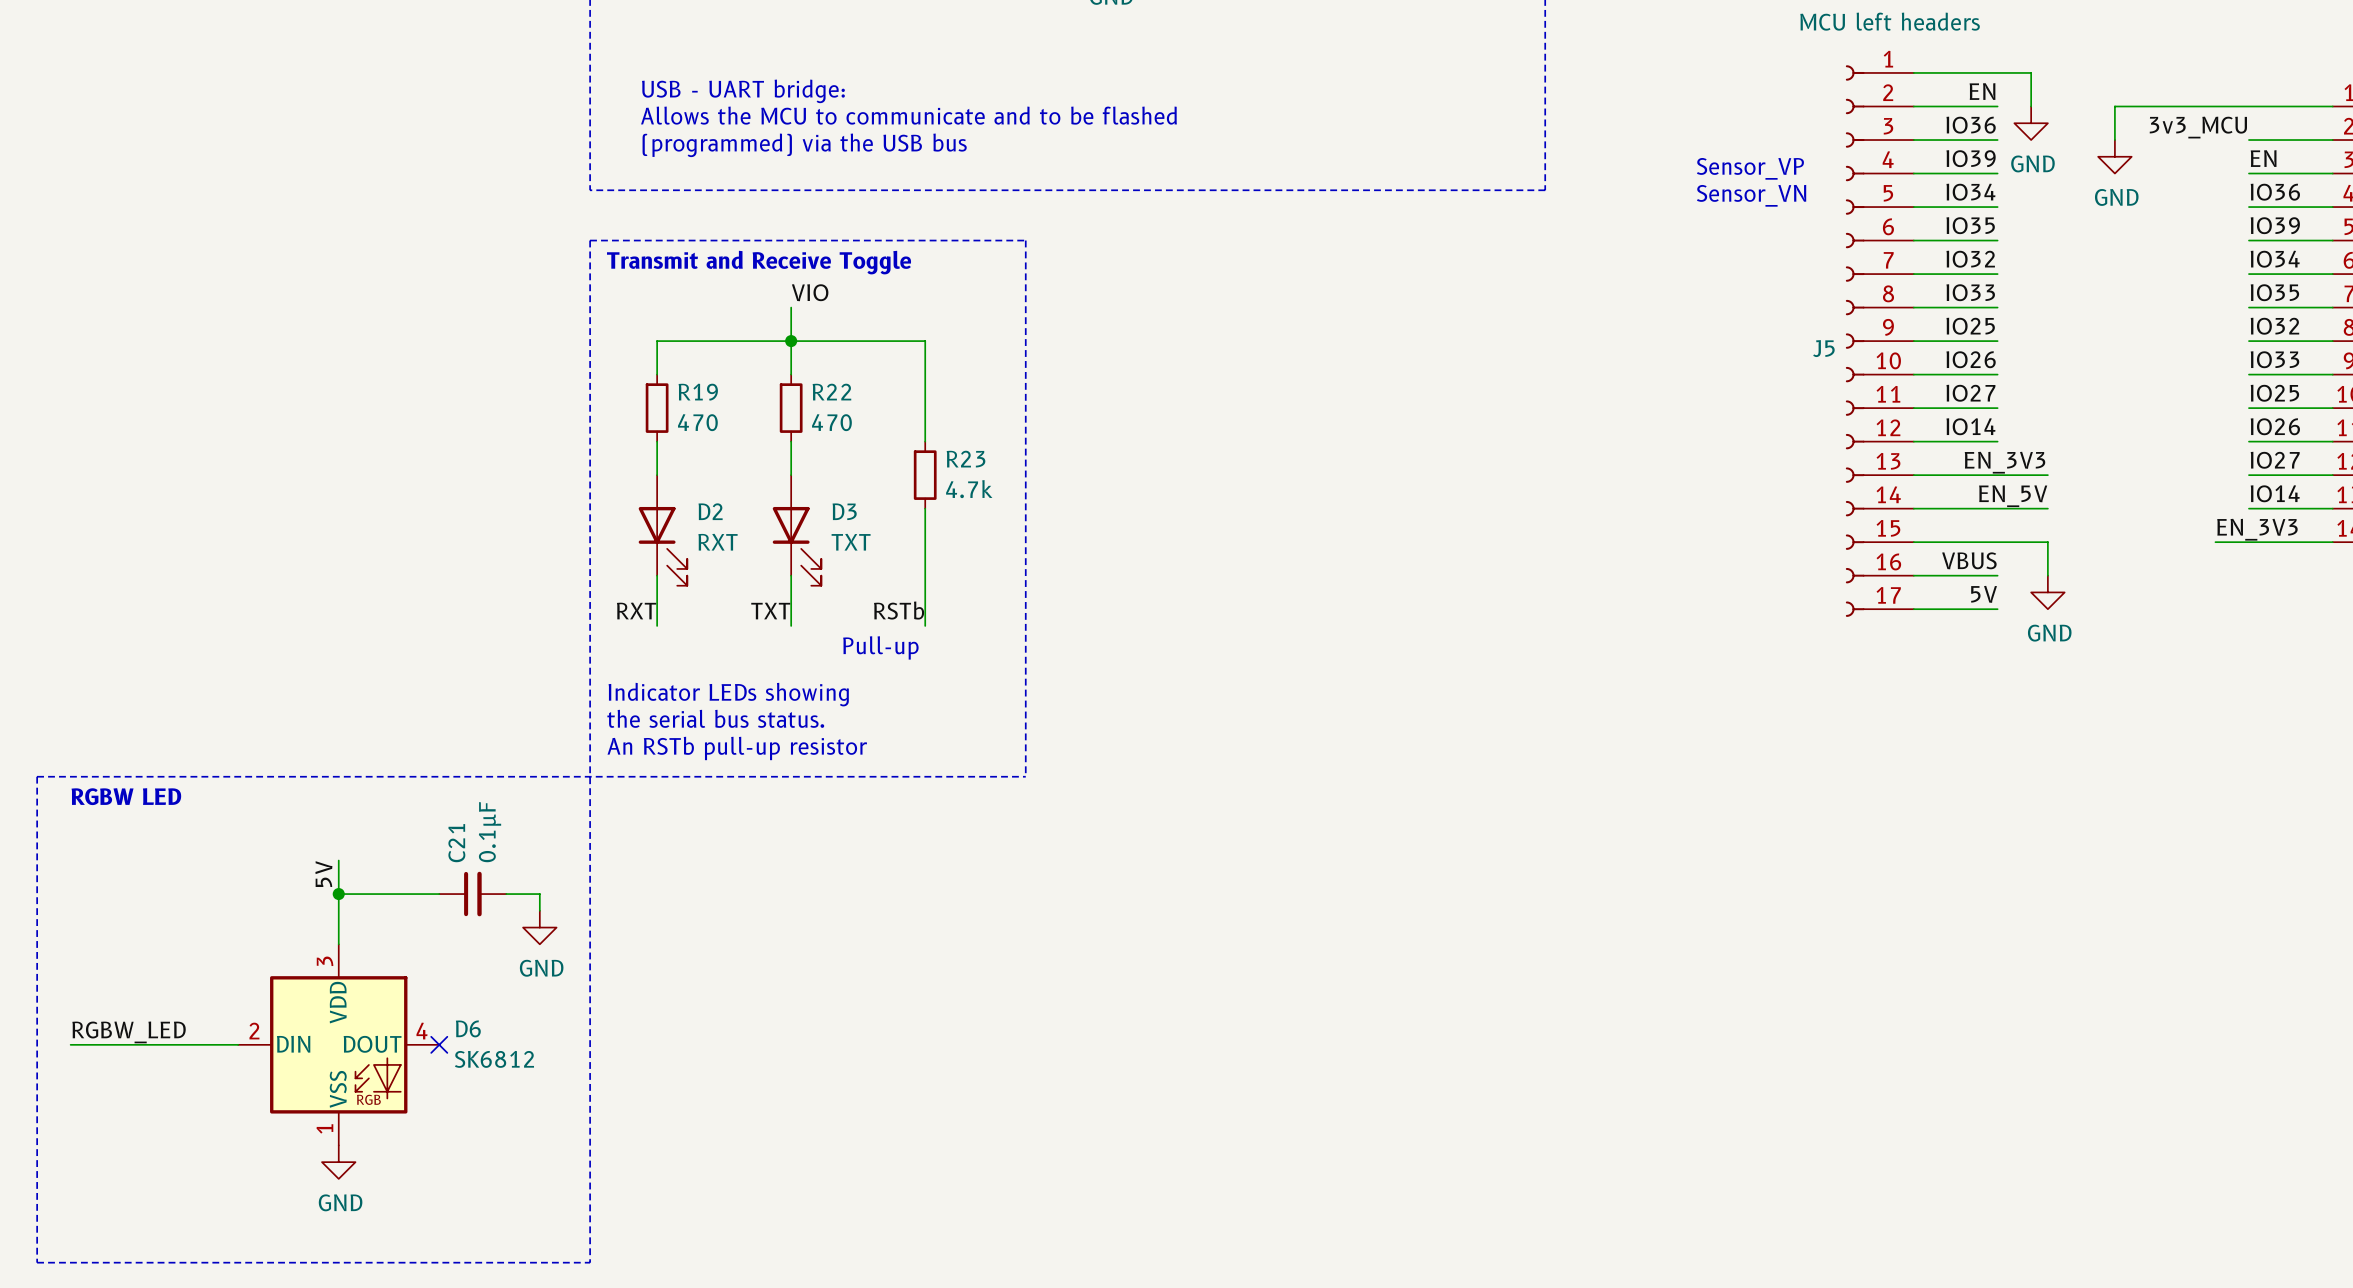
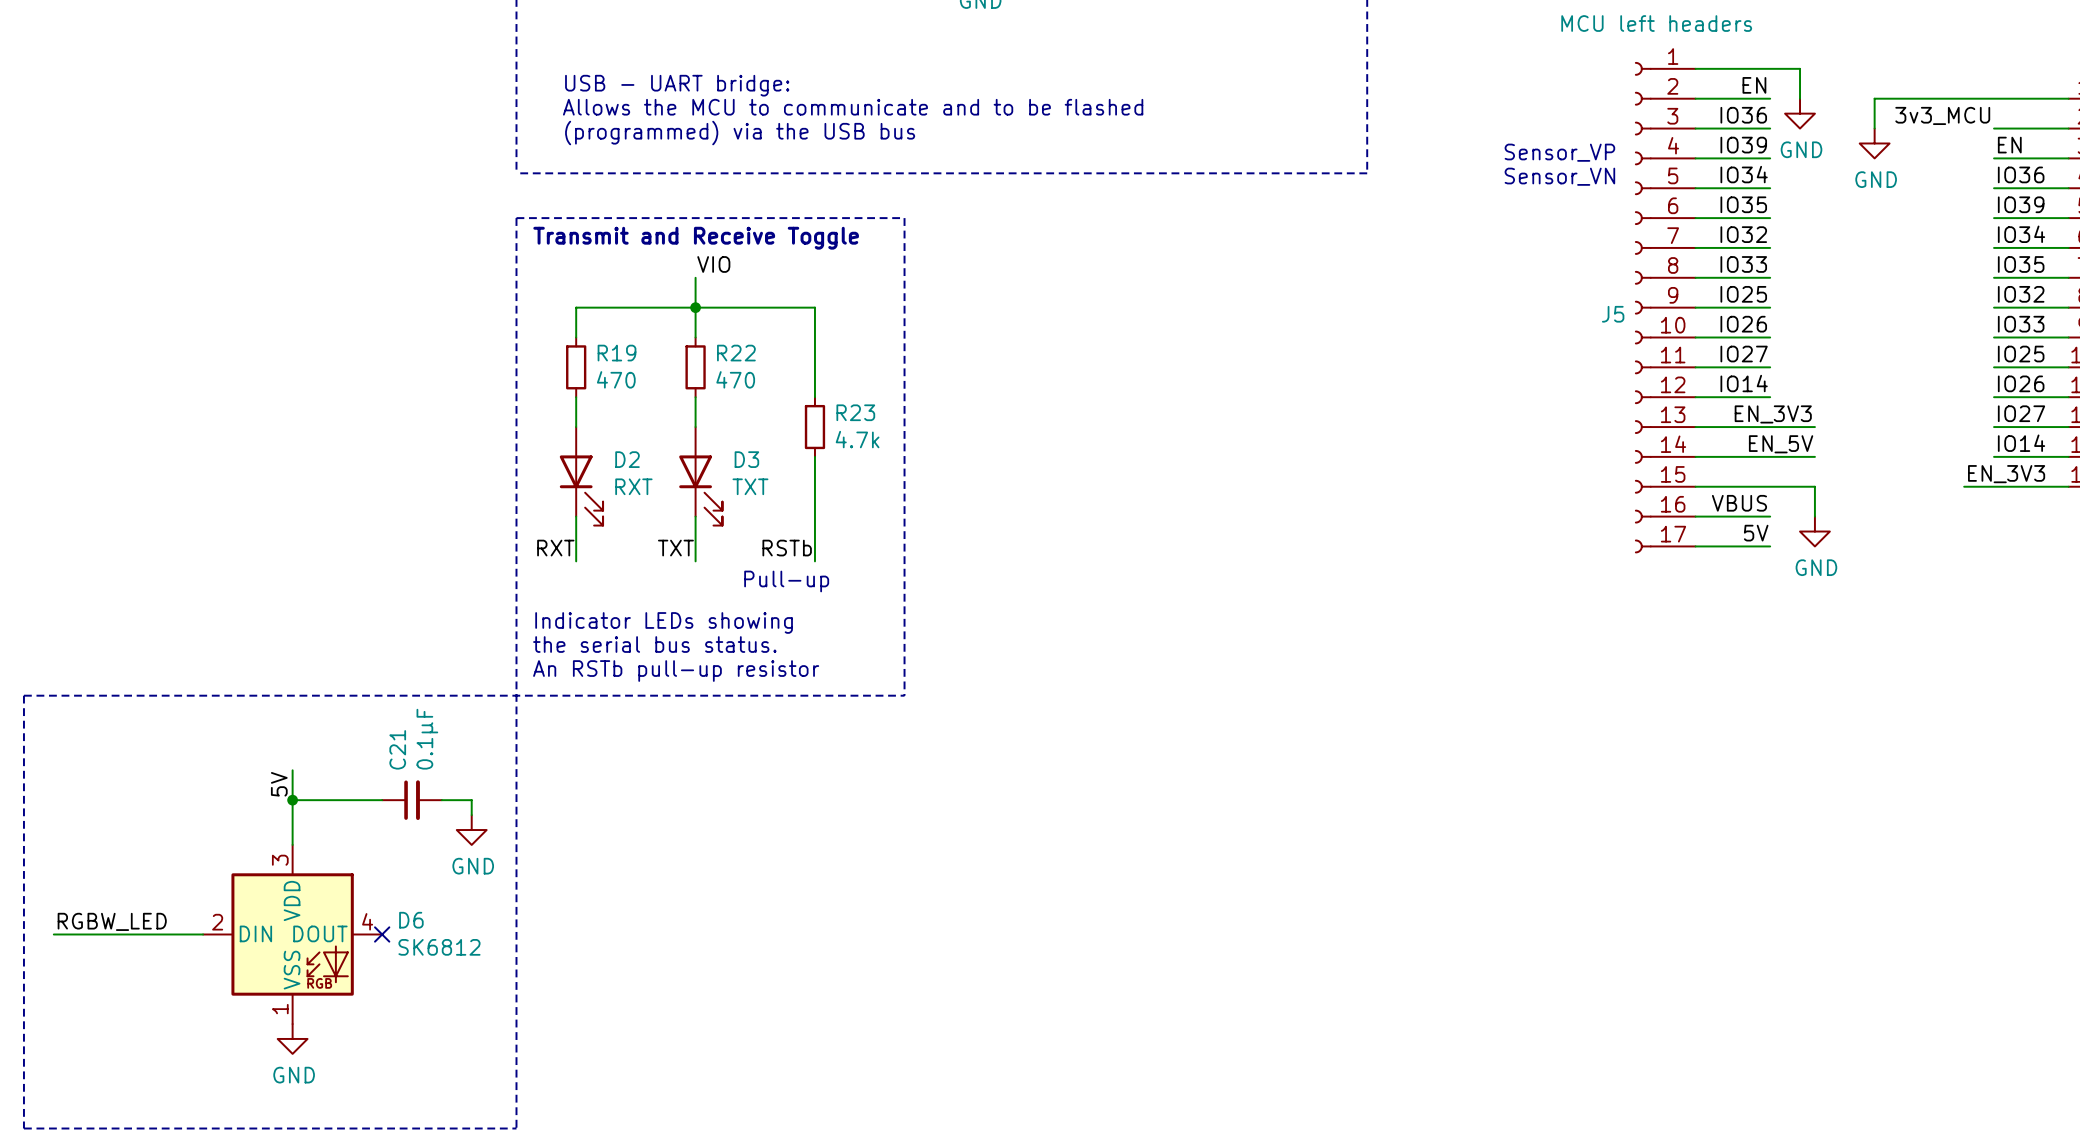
text: RGBW LED (126, 796) -> none

